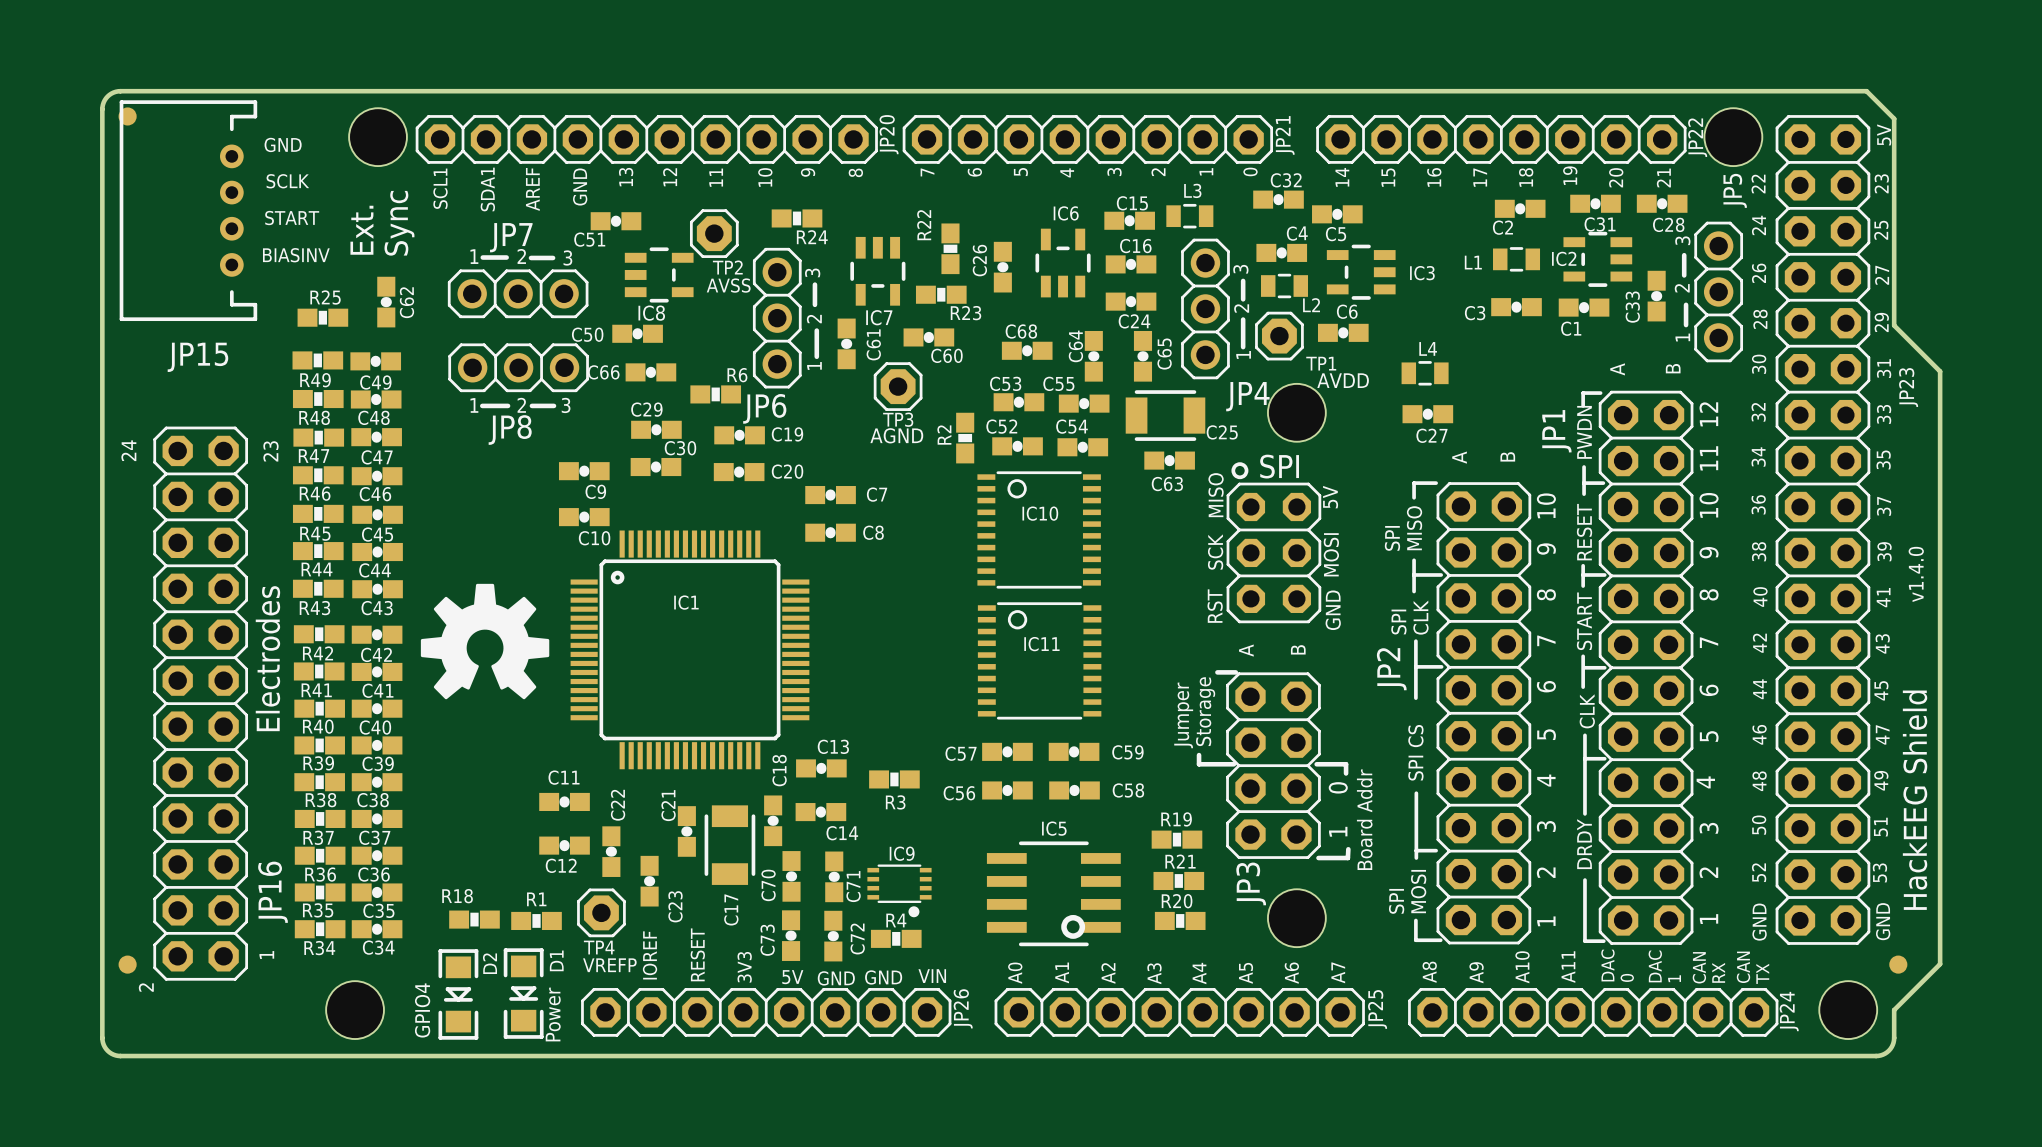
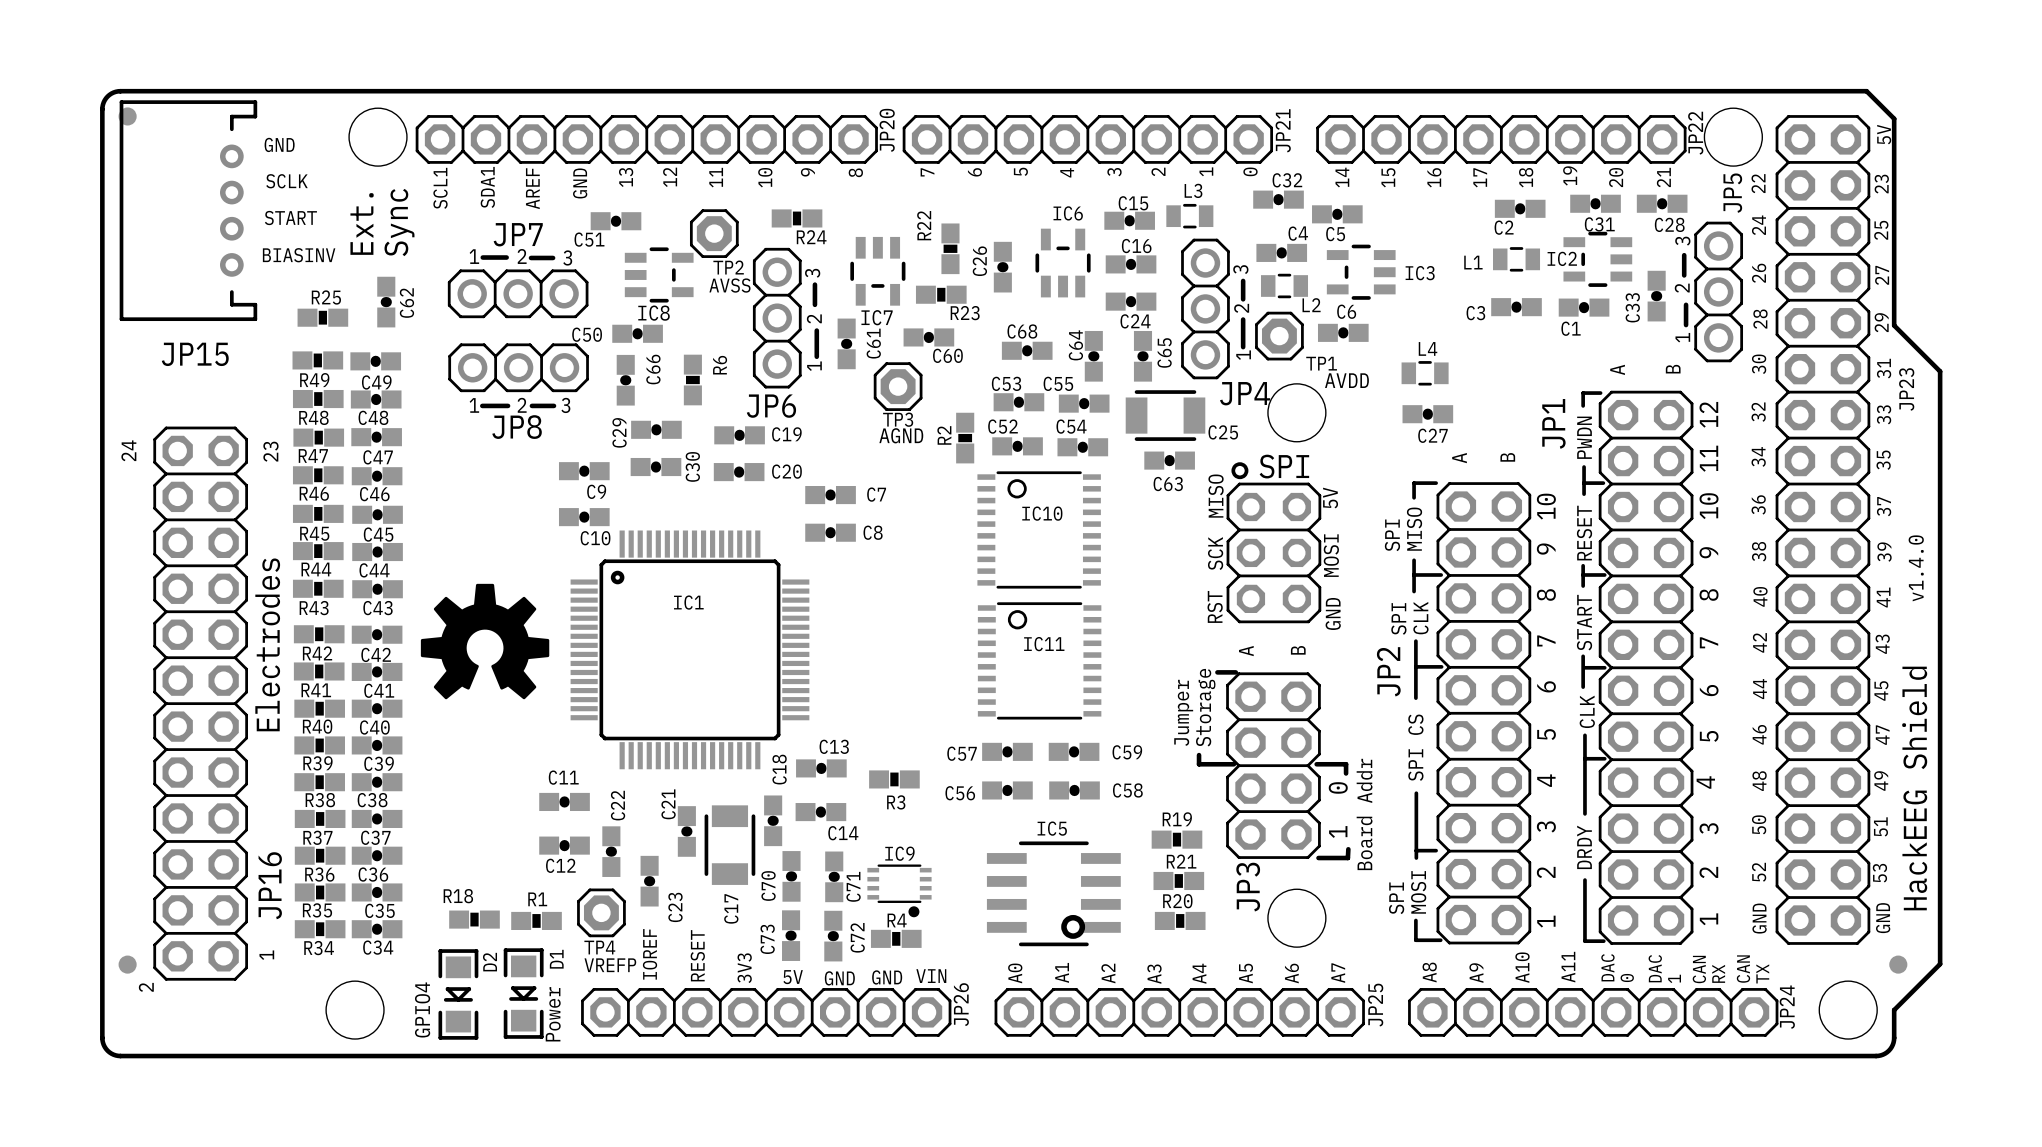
C66 name position: C66 (603, 372) -> C66 (653, 369)
C66 rotation: 0° (650, 372) -> 90° clockwise (625, 380)
R6 rotation: 0° (715, 394) -> 90° clockwise (692, 380)
C29 name rotation: 0° (646, 409) -> 90° counterclockwise (619, 432)
C30 name rotation: 0° (680, 448) -> 90° counterclockwise (692, 466)

